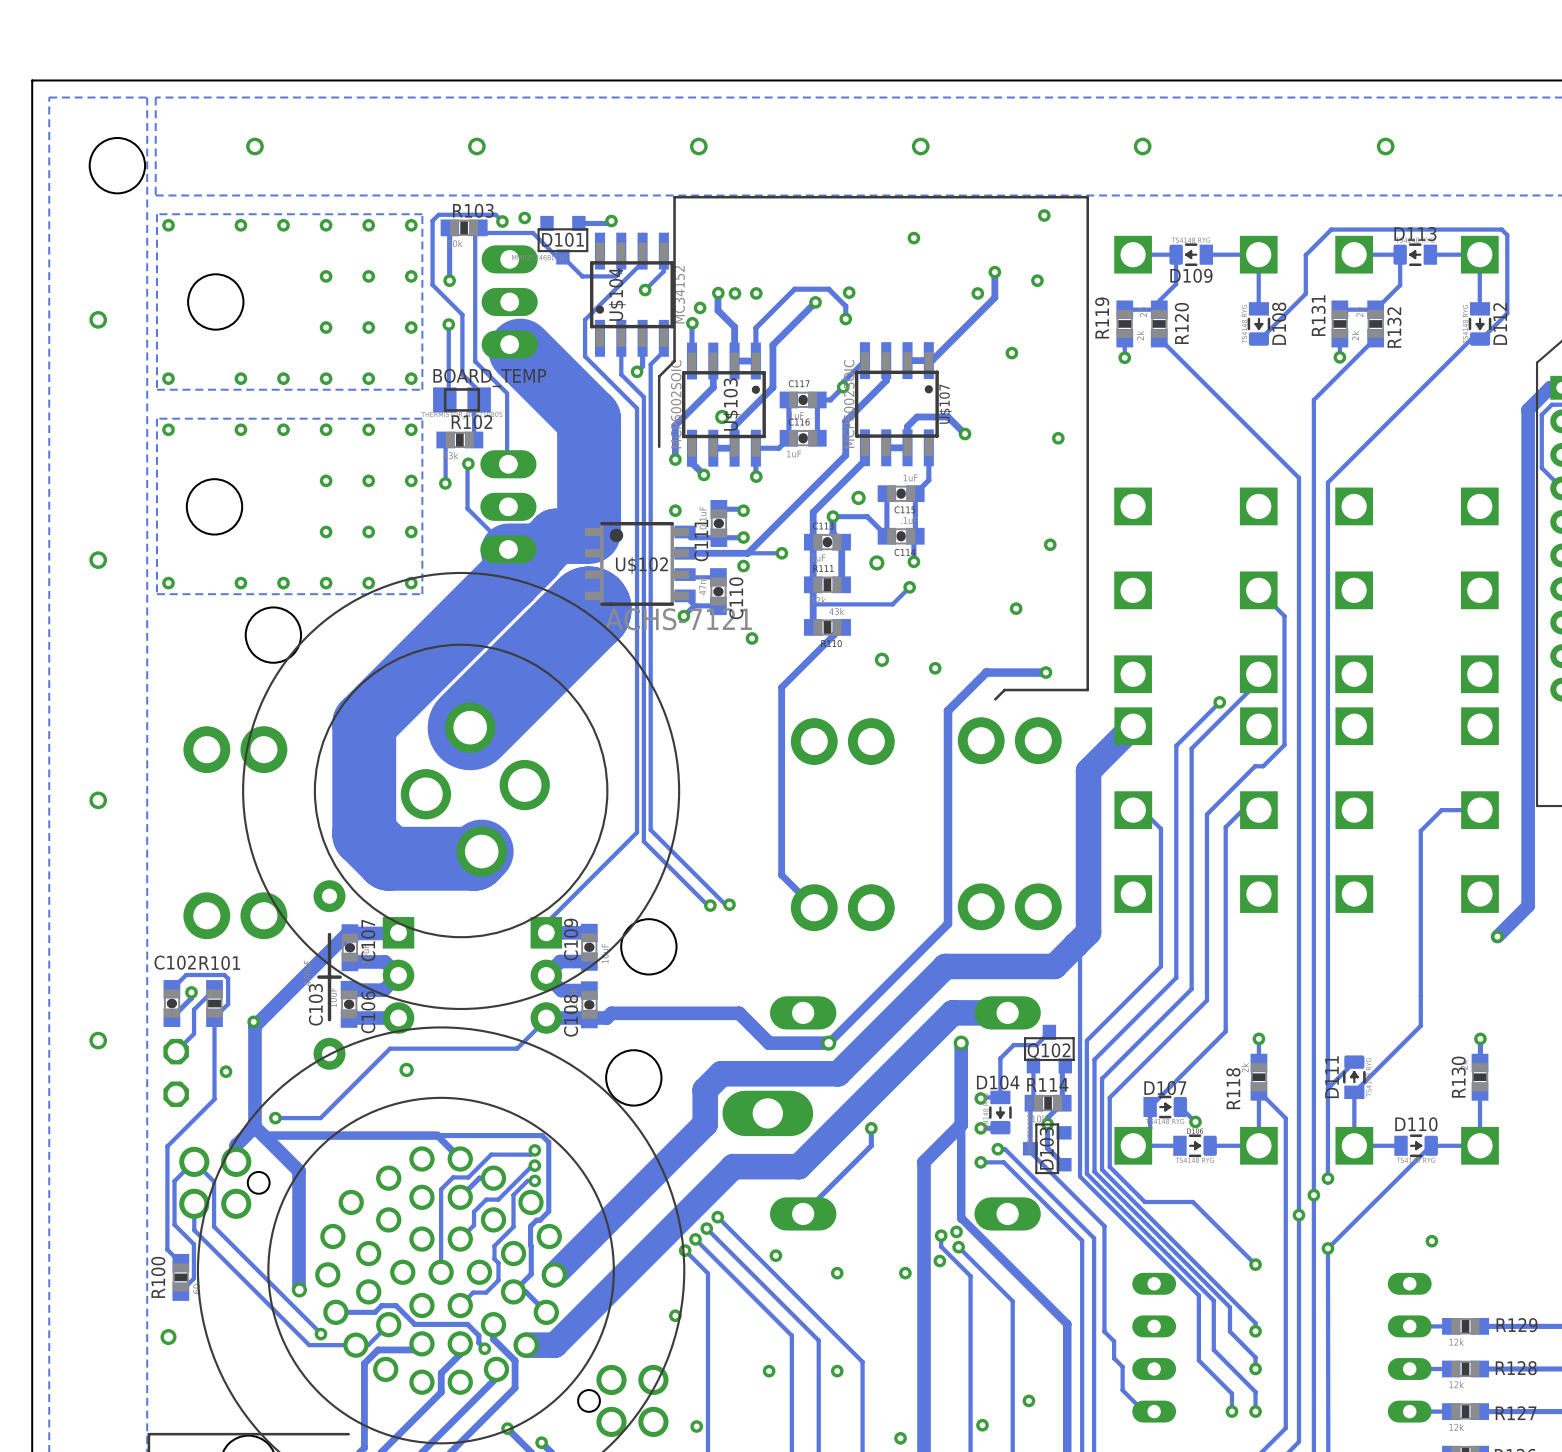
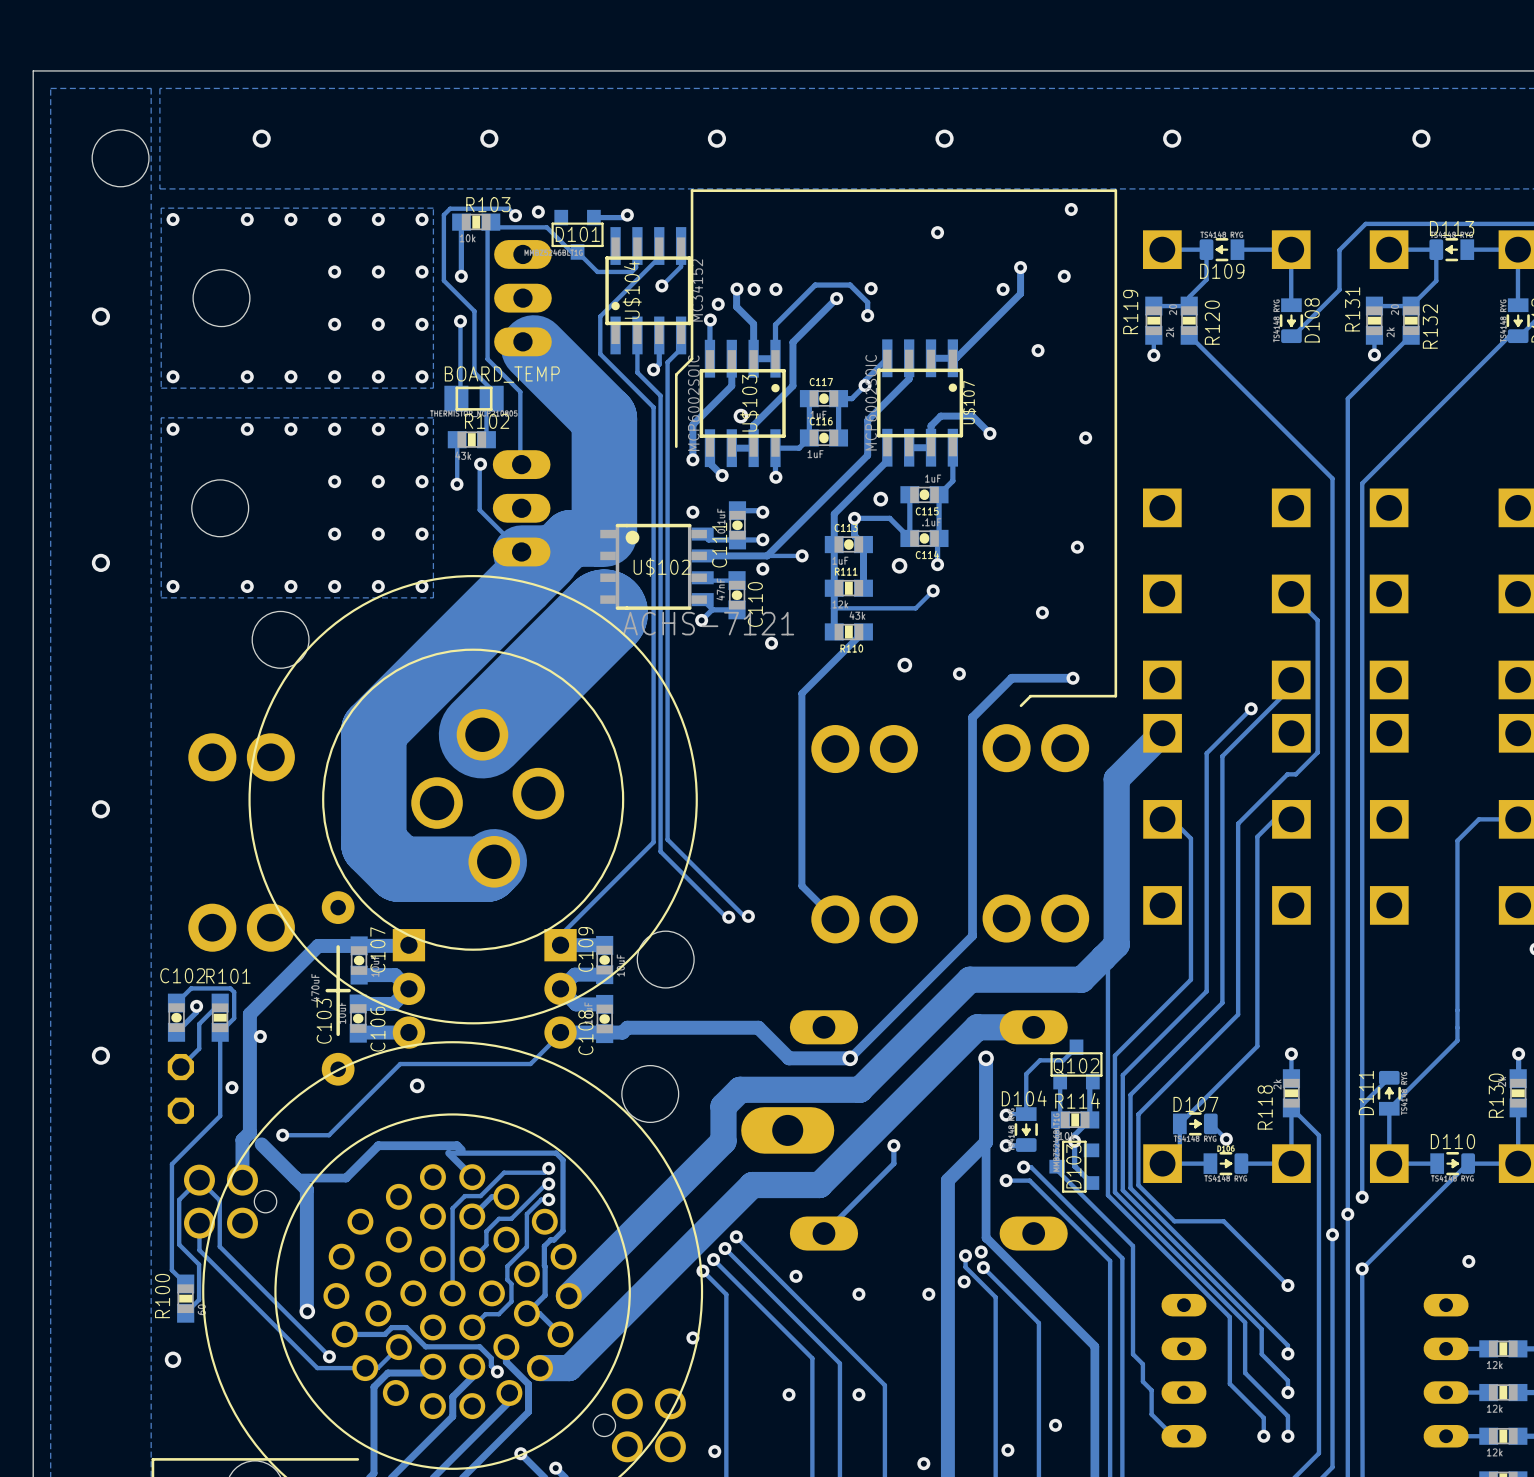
track: (349, 933) (347, 933) (254, 1026) (254, 1127) (236, 1145) -> (359, 945) (318, 945) (249, 1014) (249, 1132) (242, 1140) (242, 1163)
track: none -> (461, 1150) (456, 1145) (378, 1145) (346, 1178) (295, 1178)
track: (437, 1135) (263, 1135) -> none

